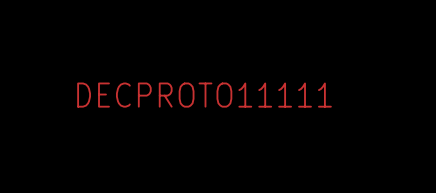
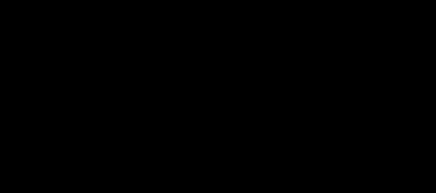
part: DECPROTO11111 (204, 95) -> none

